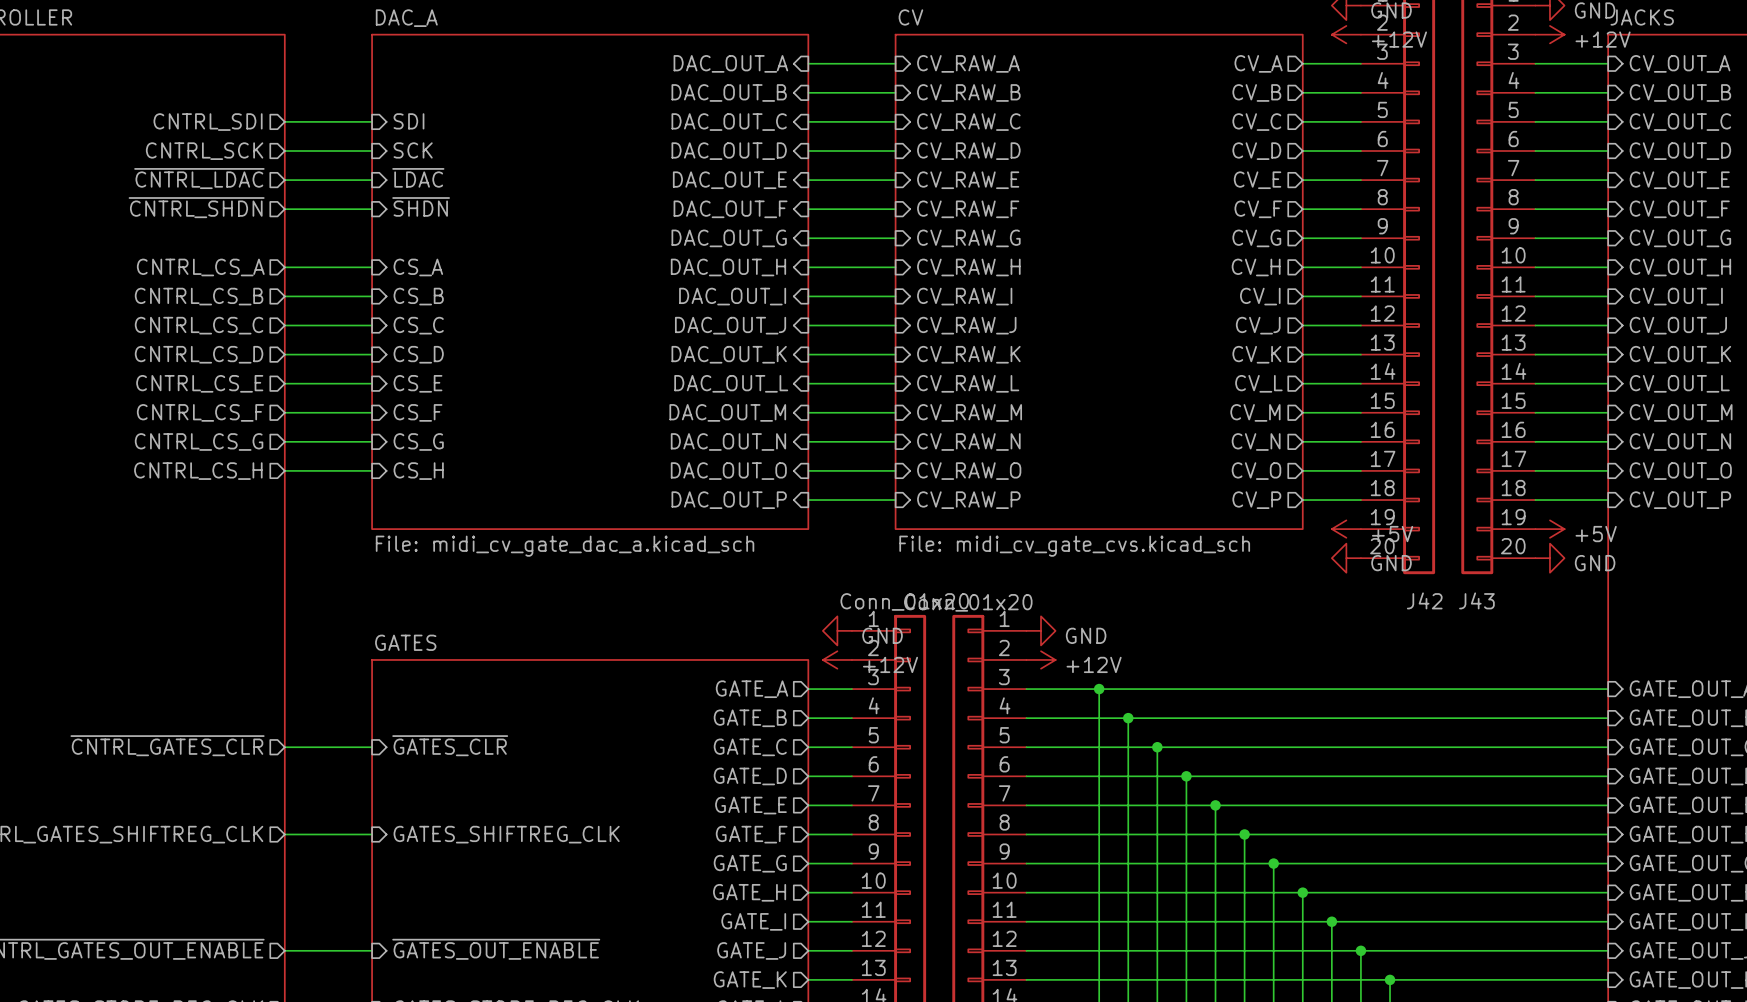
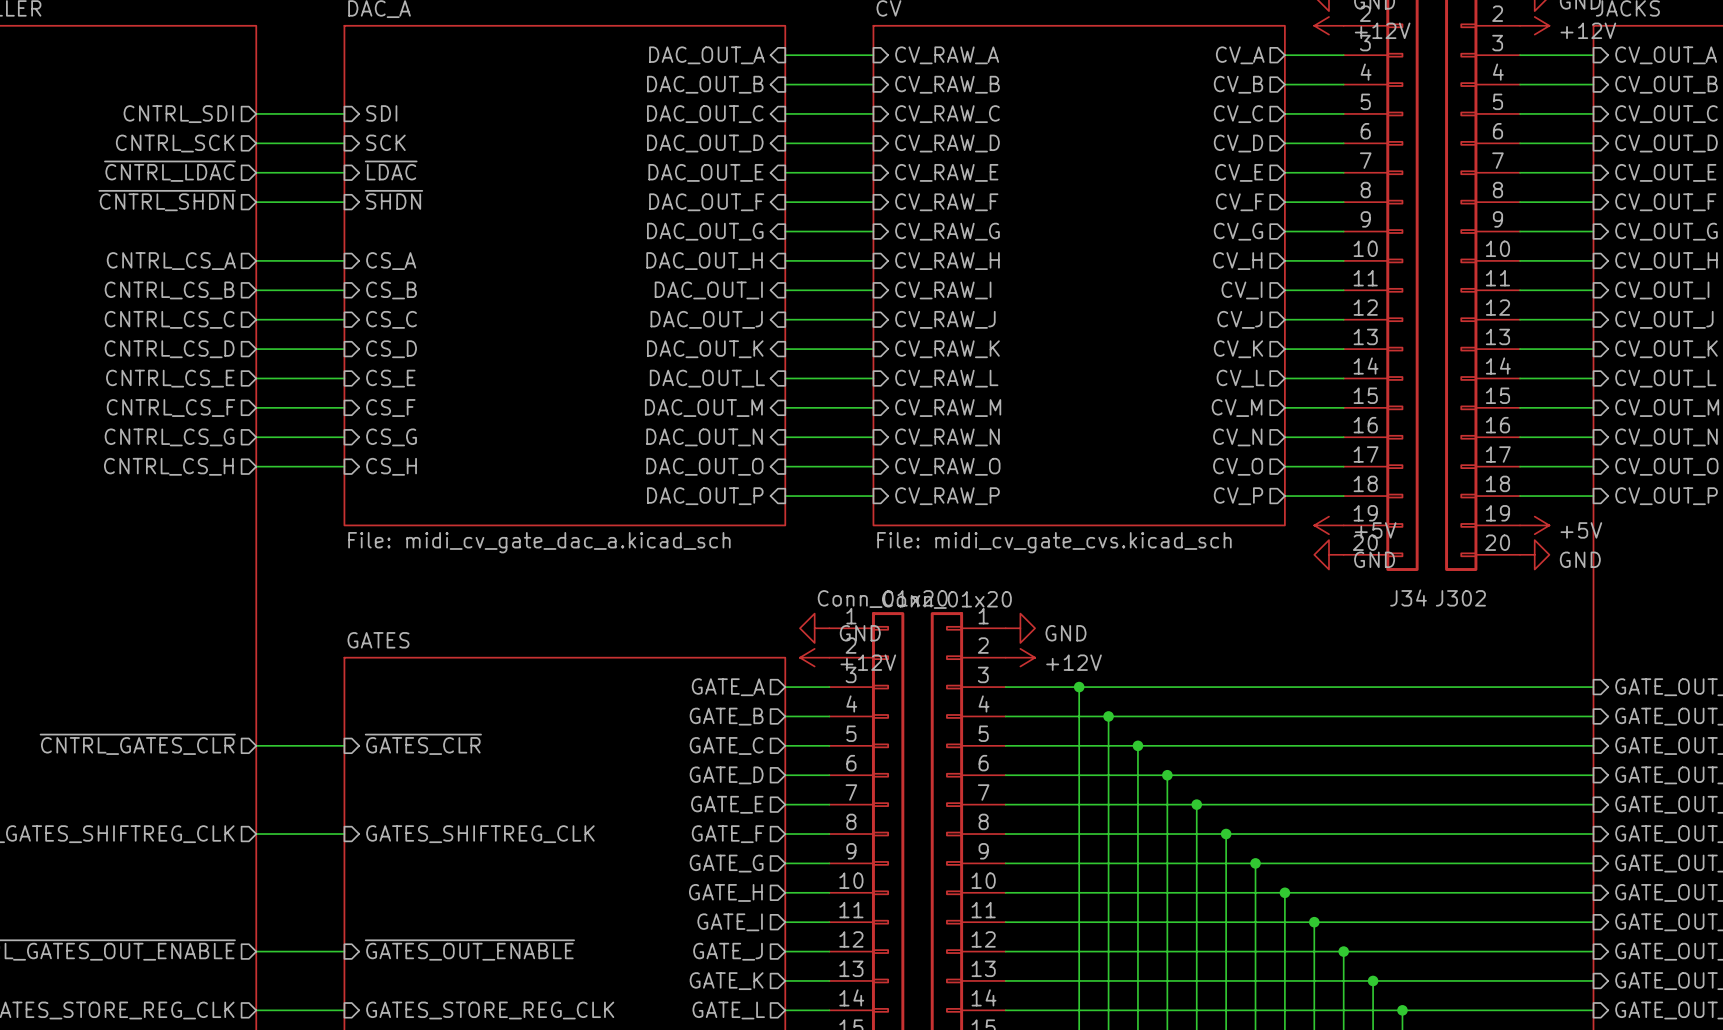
J42 name: J42 (1424, 600) -> J34 (1408, 598)
J43 name: J43 (1476, 600) -> J302 (1460, 598)

